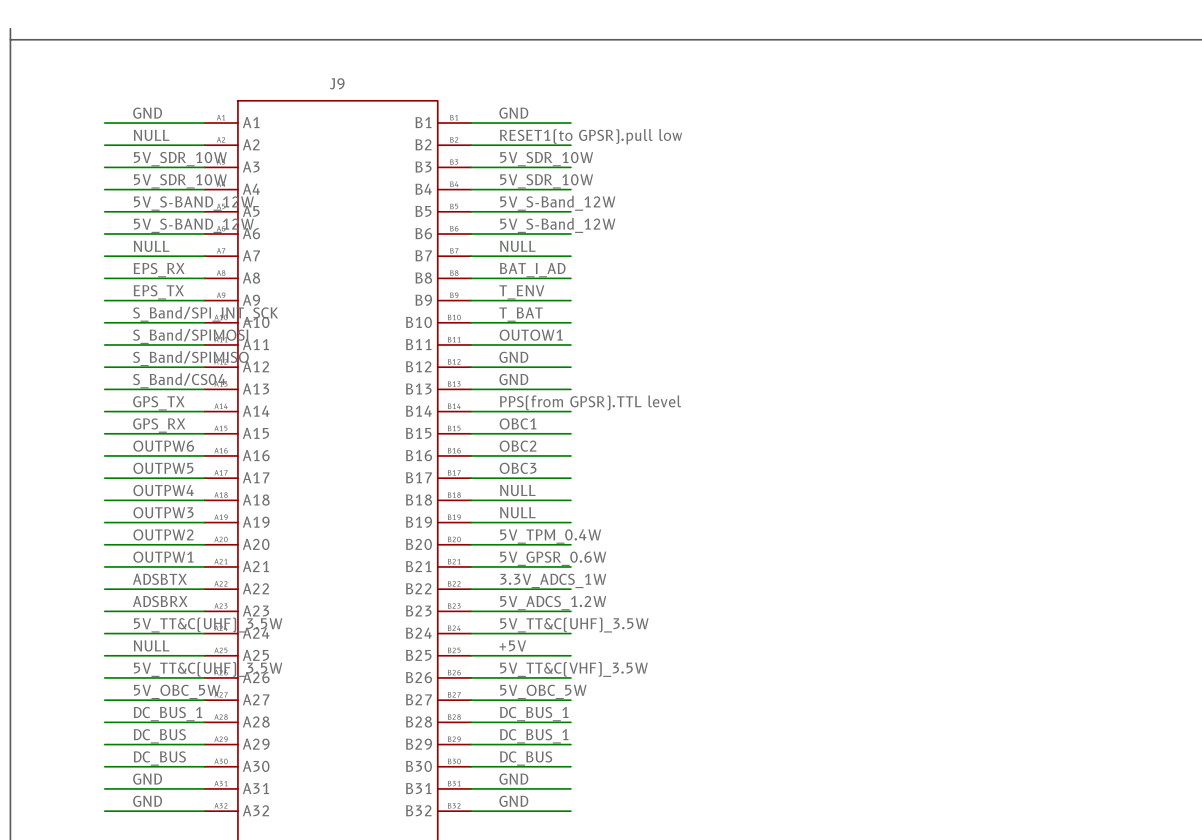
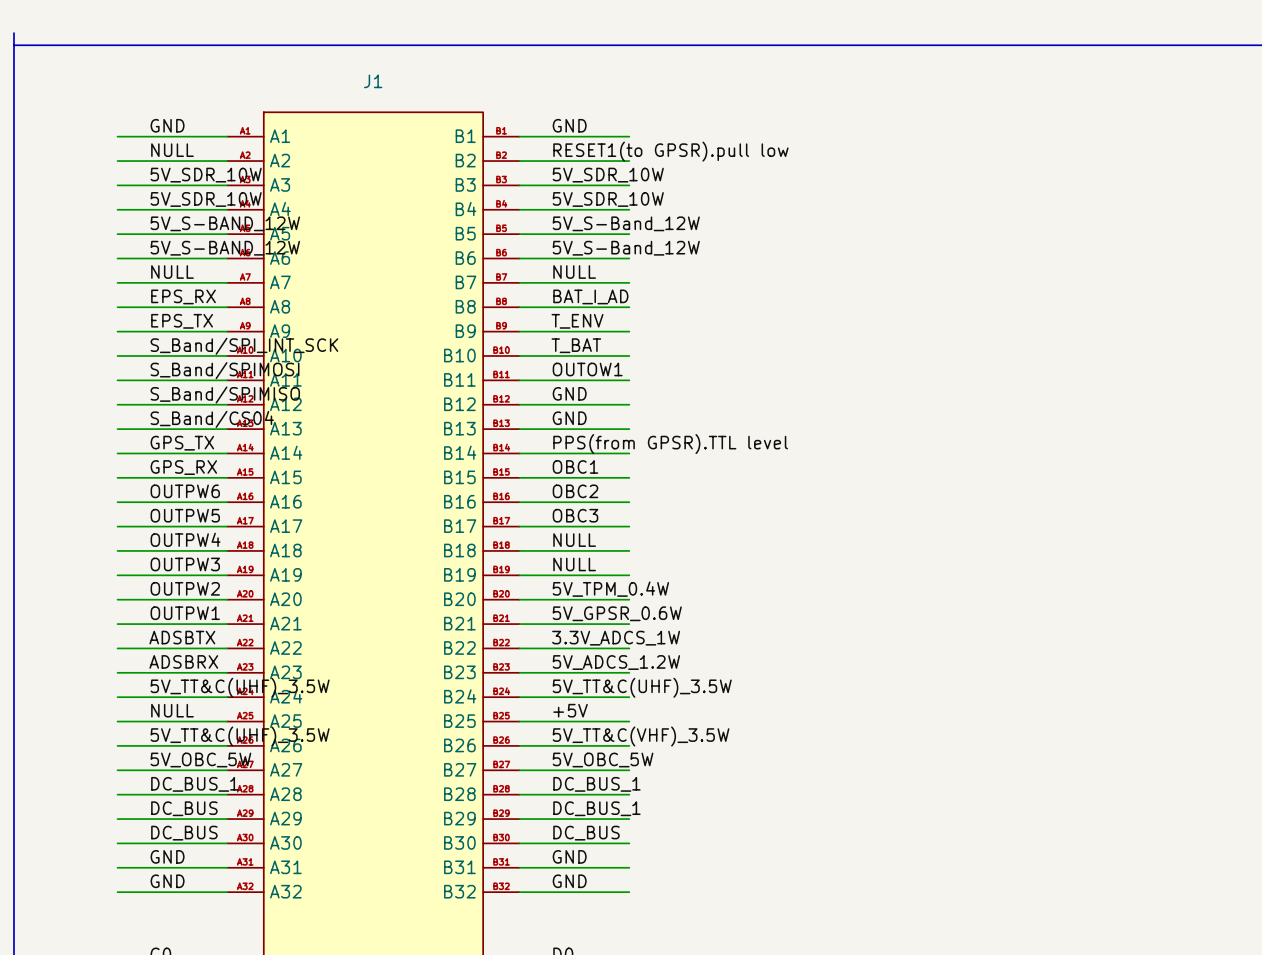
J9 name: J9 (337, 83) -> J1 (373, 81)

